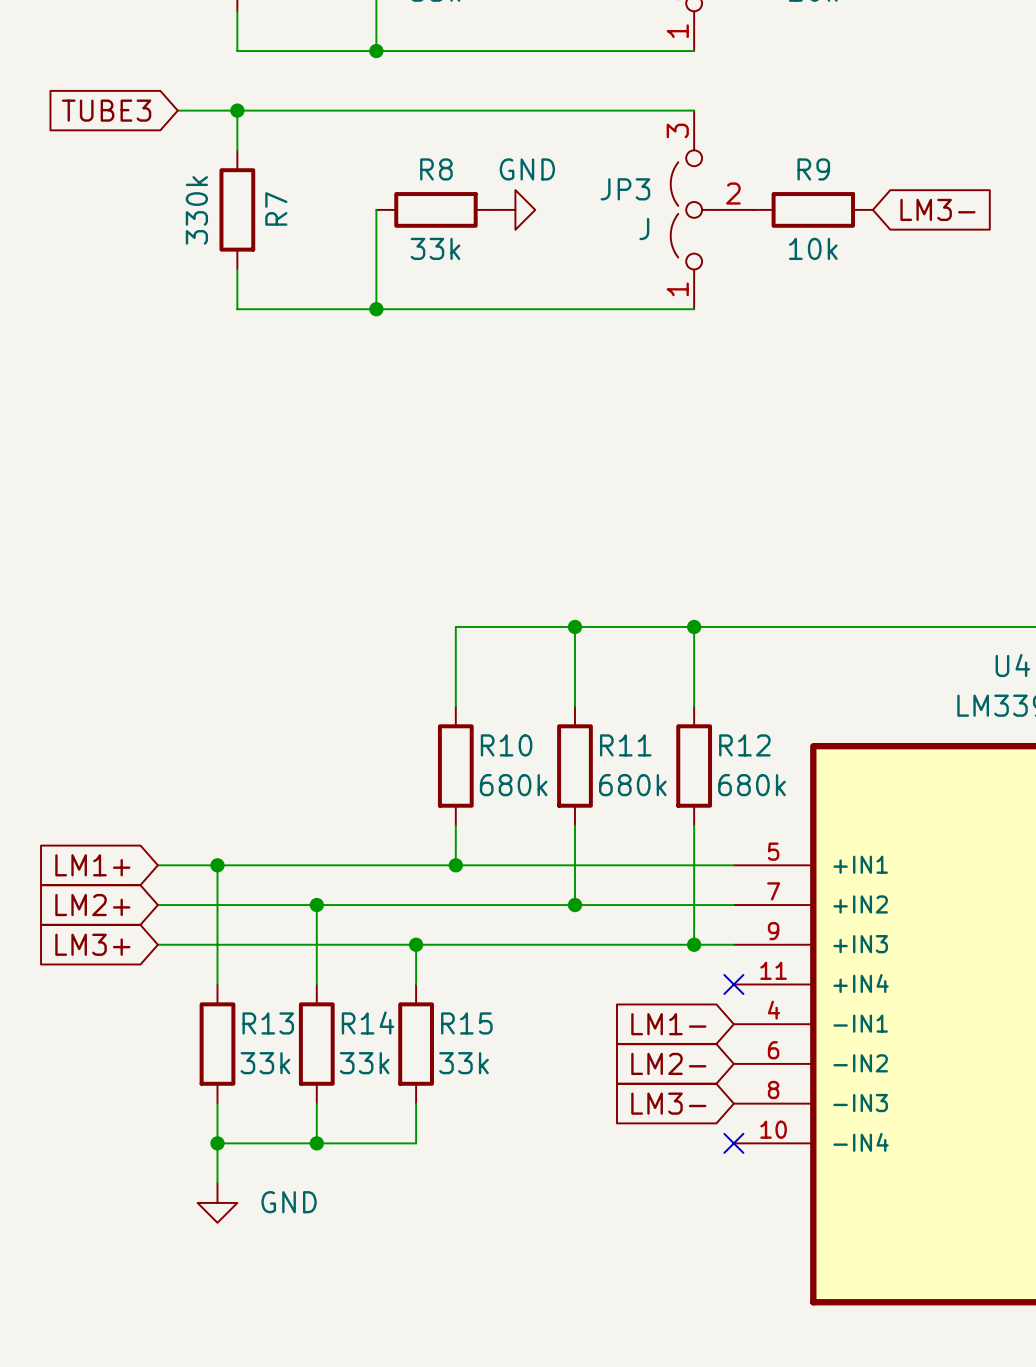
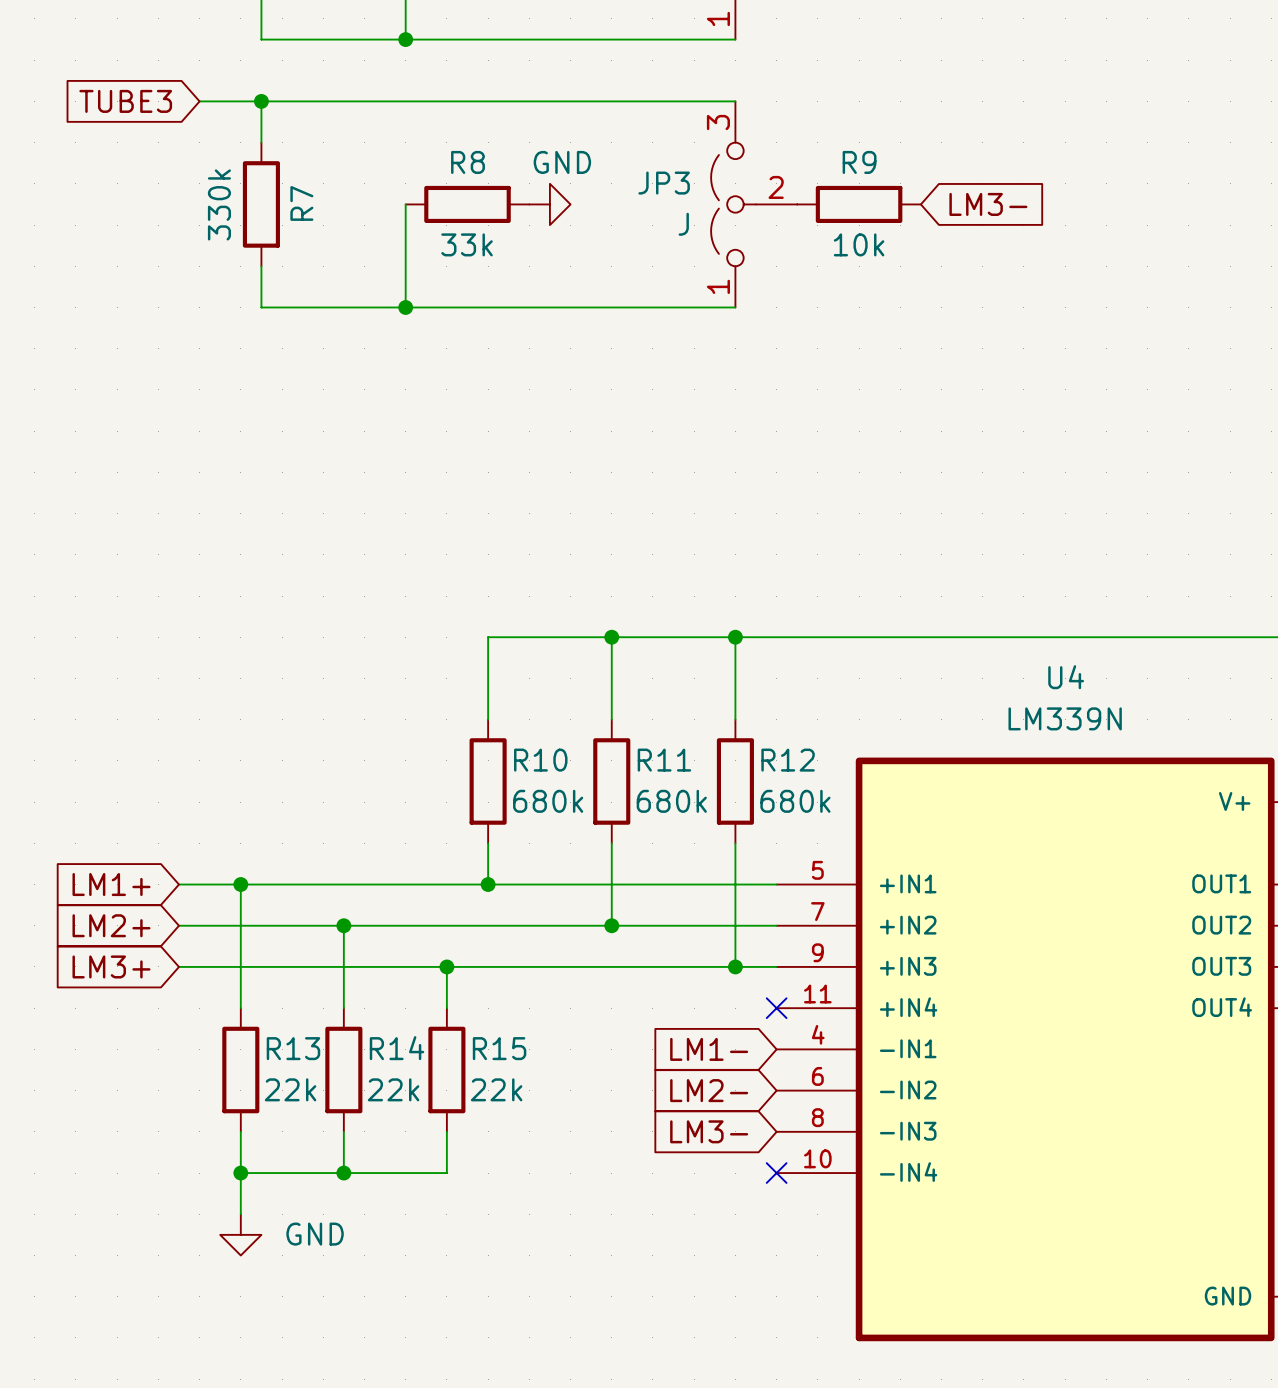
R13 value: 33k (265, 1063) -> 22k (290, 1089)
R14 value: 33k (364, 1063) -> 22k (393, 1089)
R15 value: 33k (464, 1063) -> 22k (496, 1089)

